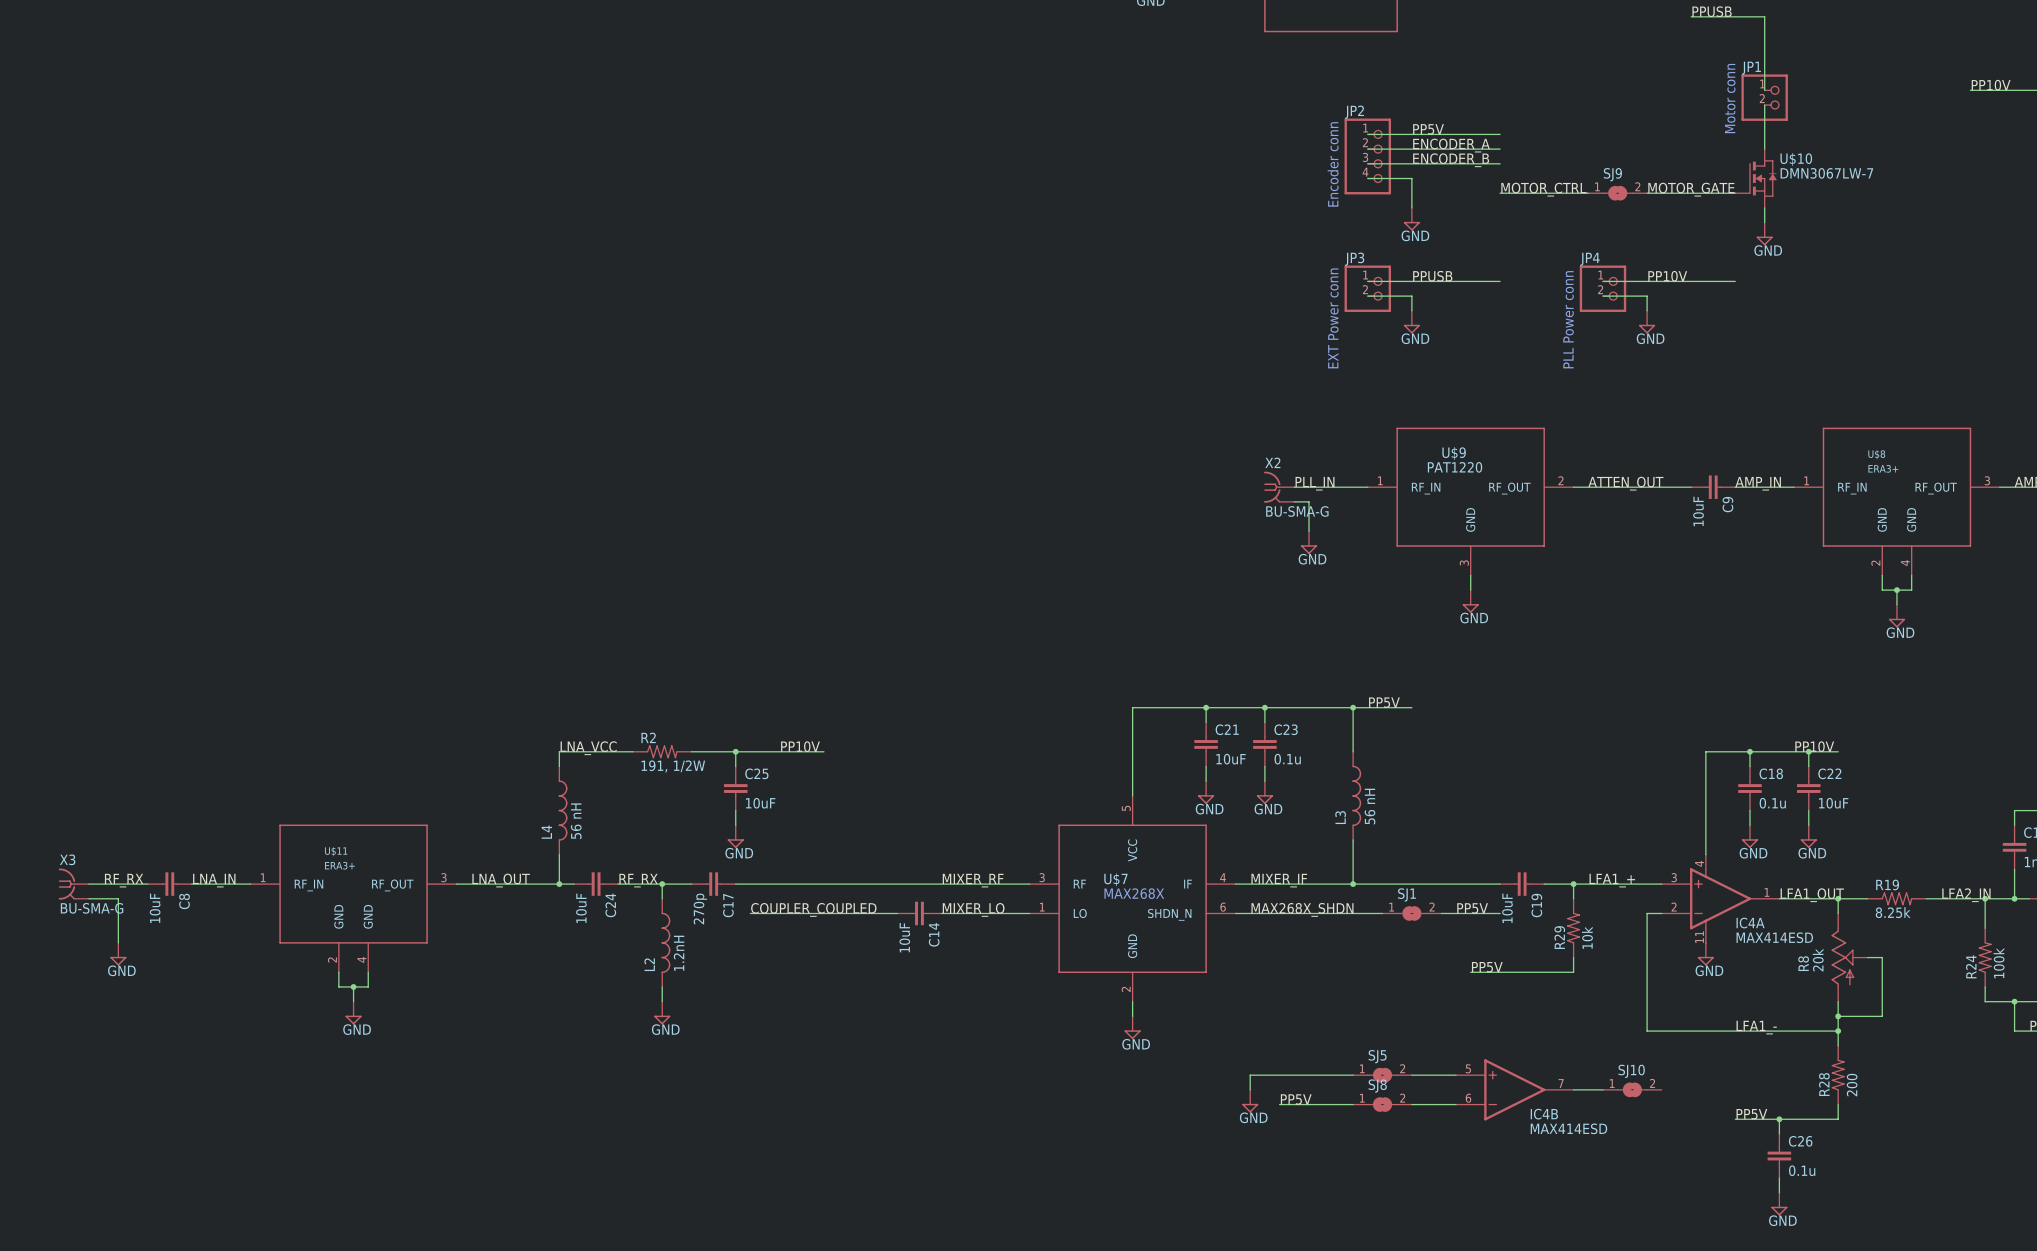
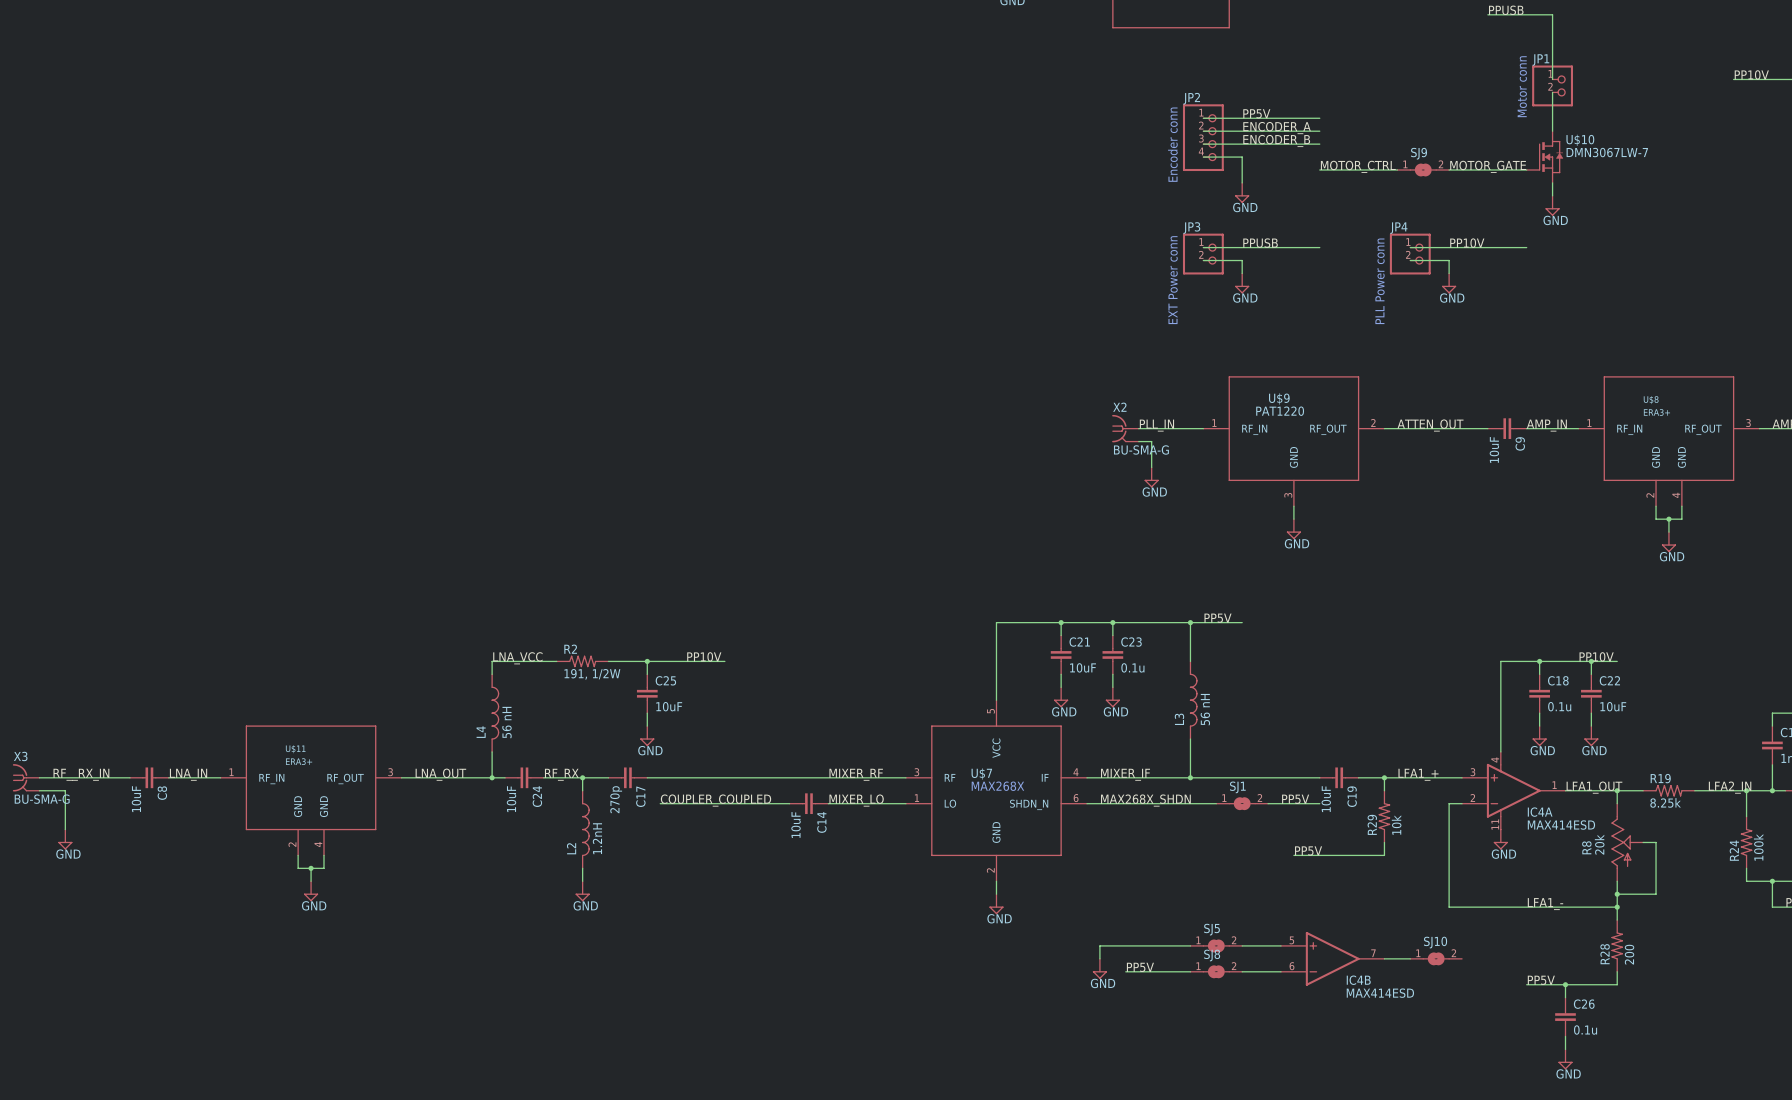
label: RF_RX (124, 880) -> RF__RX_IN (81, 774)
wire: none -> (39, 777) (78, 777)
X3 position: (73, 884) -> (26, 777)
wire: (88, 898) (118, 898) (118, 942) -> (39, 790) (65, 790) (65, 829)
power symbol position: GND (118, 954) -> GND (65, 839)

